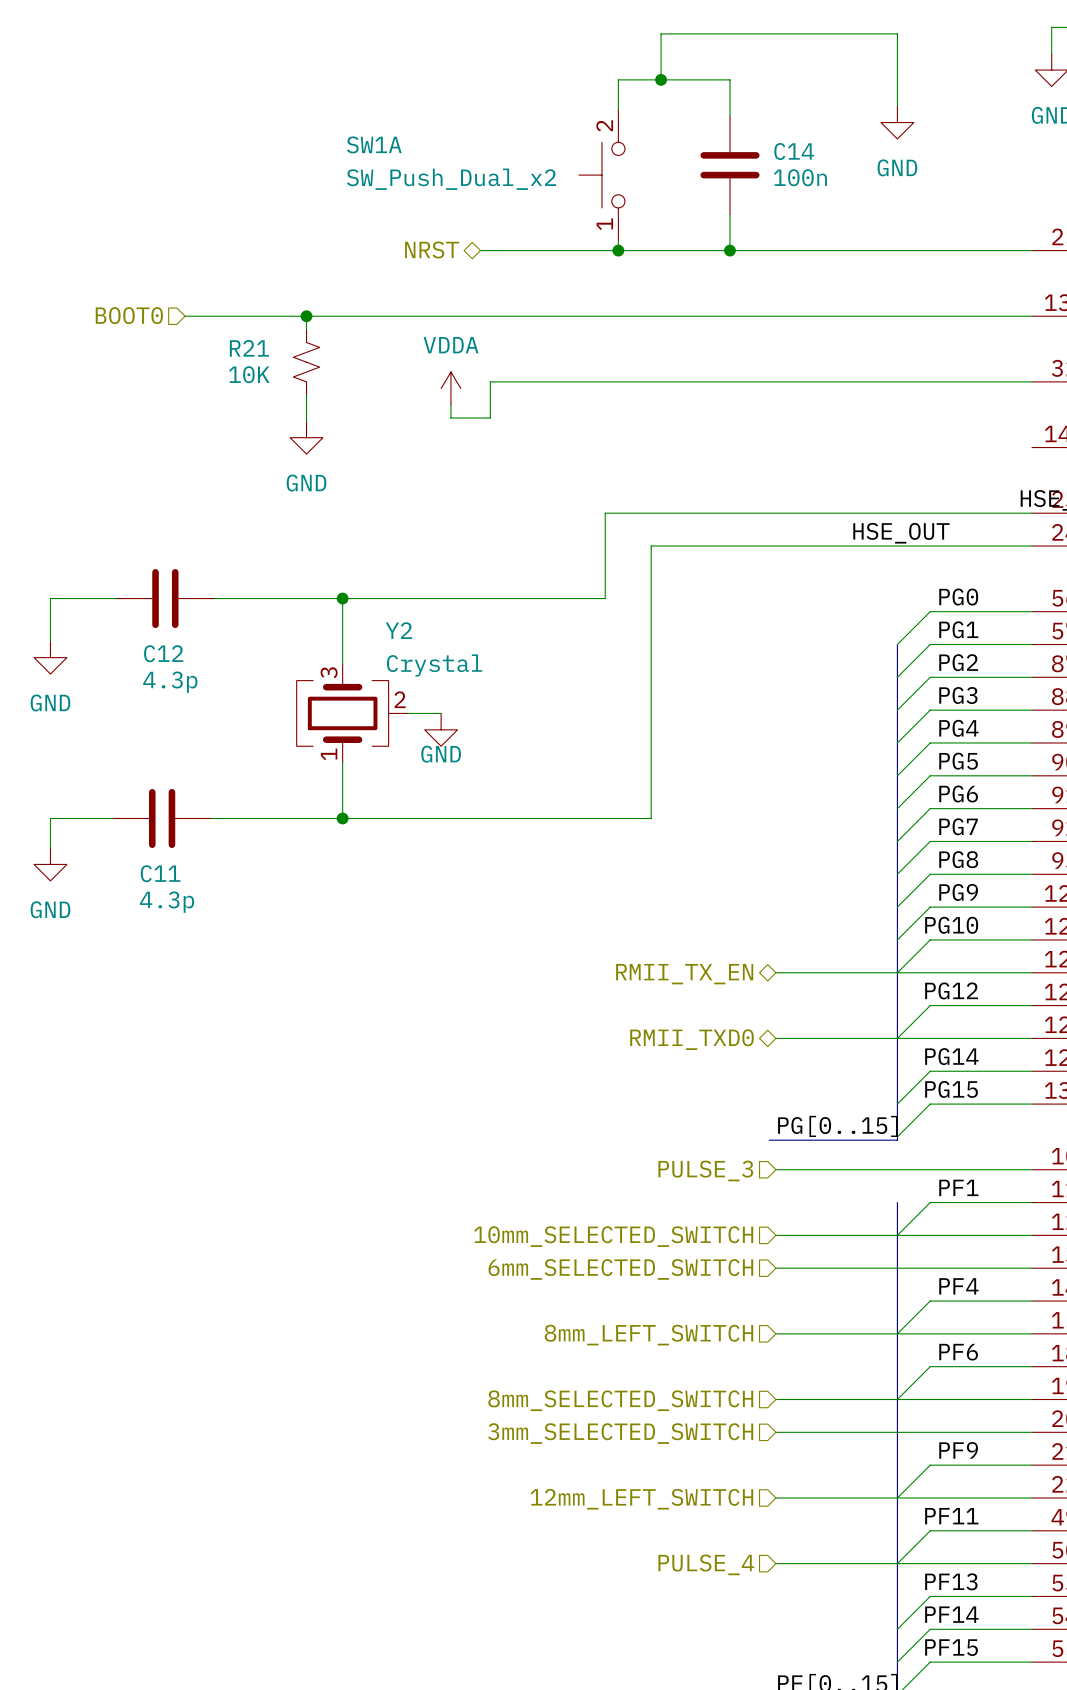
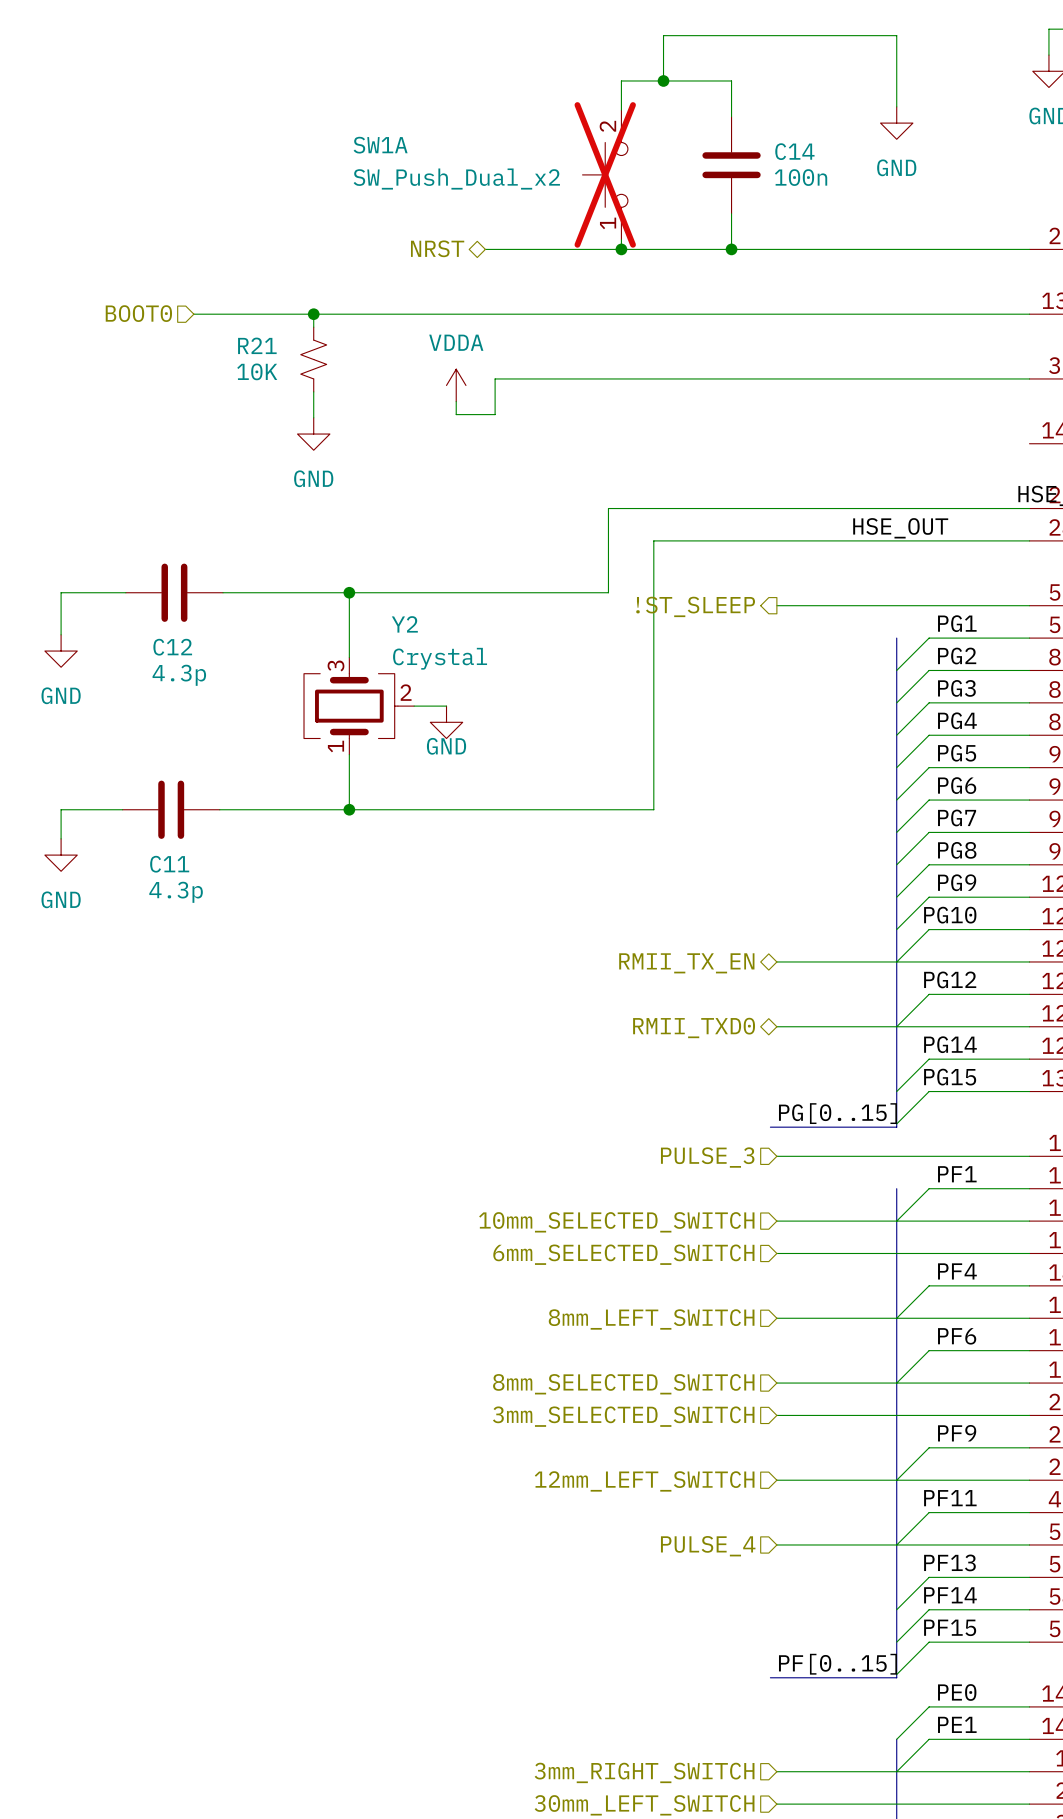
SW1A do-not-place cross: none -> (605, 174)
label: PG0 (958, 597) -> none
wire: (930, 611) (897, 644) -> (929, 605) (776, 605)
hierarchical label: none -> !ST_SLEEP (695, 606)

